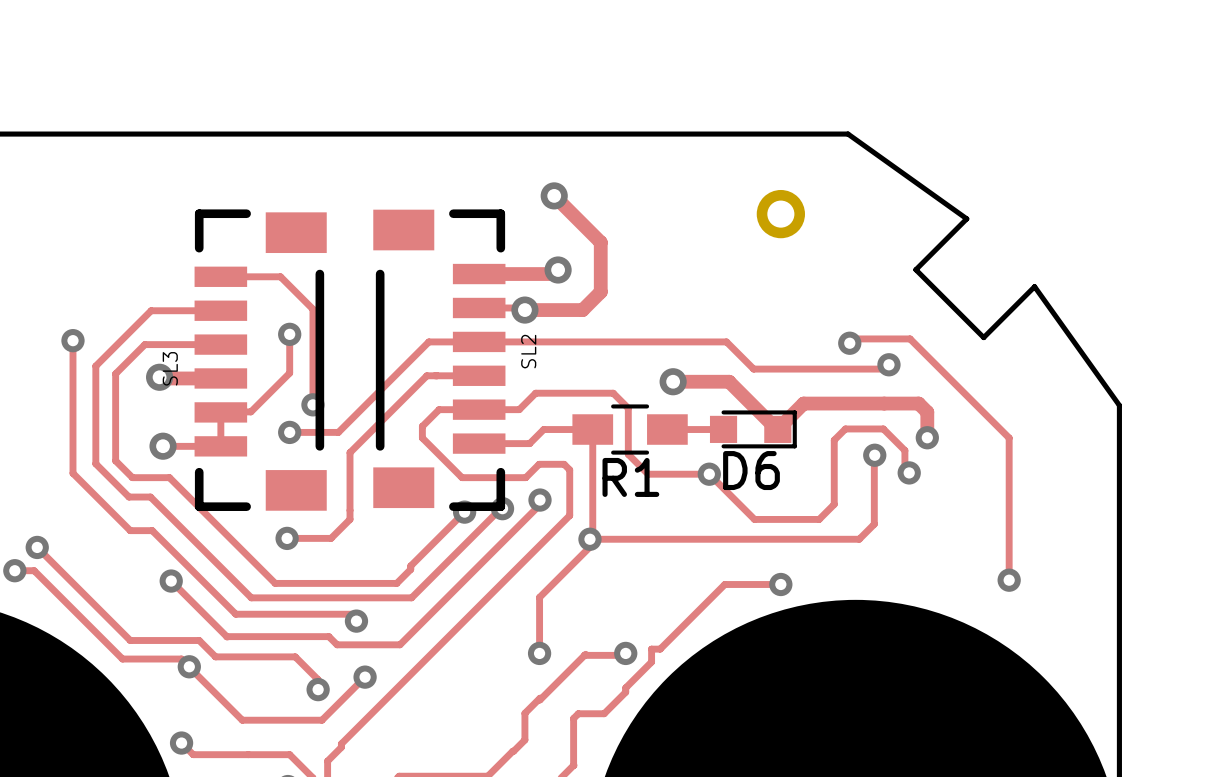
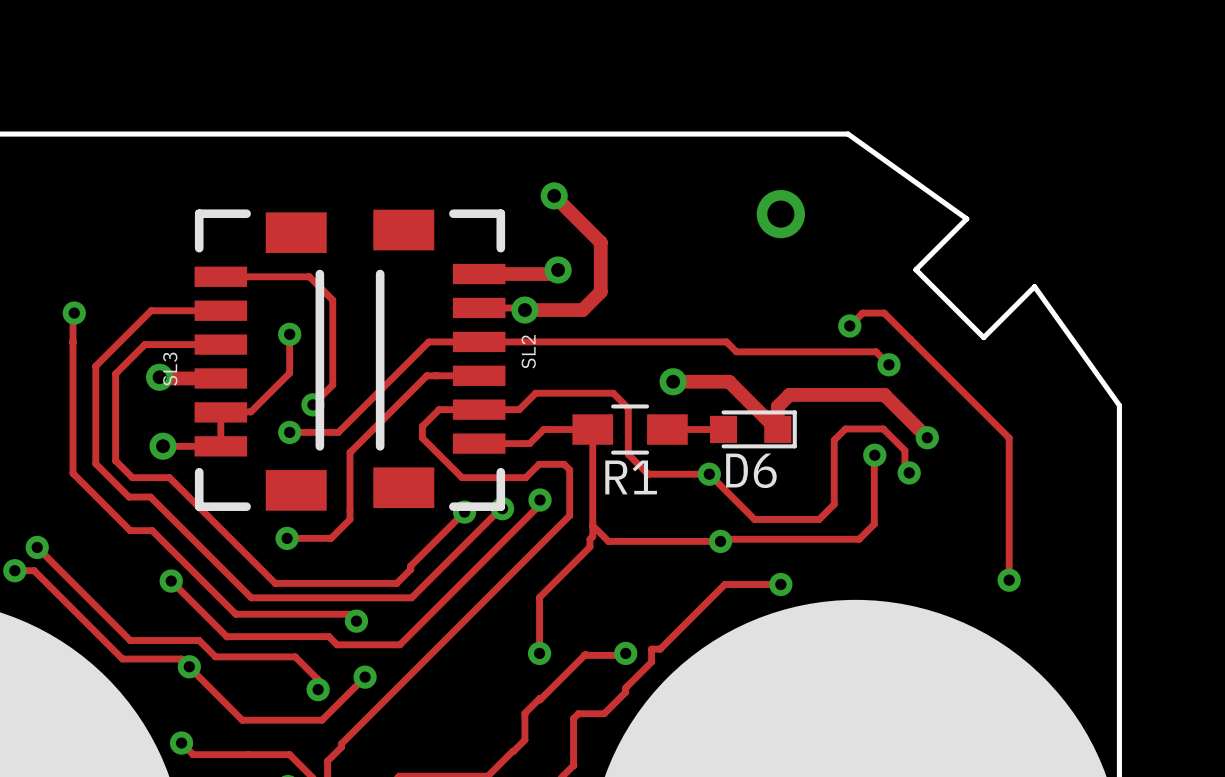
track: (280, 276) (312, 309) (312, 404) -> (280, 276) (309, 276) (332, 300) (332, 385) (312, 404)
track: none -> (74, 313) (72, 340)
track: (910, 338) (854, 338) (849, 343) -> (910, 338) (884, 313) (862, 313) (849, 326)
via position: (72, 340) -> (74, 313)
via position: (849, 343) -> (849, 326)
track: (736, 351) (753, 369) (884, 369) (888, 364) -> (736, 351) (876, 351) (888, 364)
track: (777, 429) (803, 403) (918, 403) (927, 412) (927, 437) -> (777, 429) (777, 406) (789, 394) (884, 394) (927, 437)
track: (589, 539) (722, 539) -> (592, 525) (608, 541) (720, 541) (722, 539)
via: (589, 539) -> none
via: none -> (720, 541)

